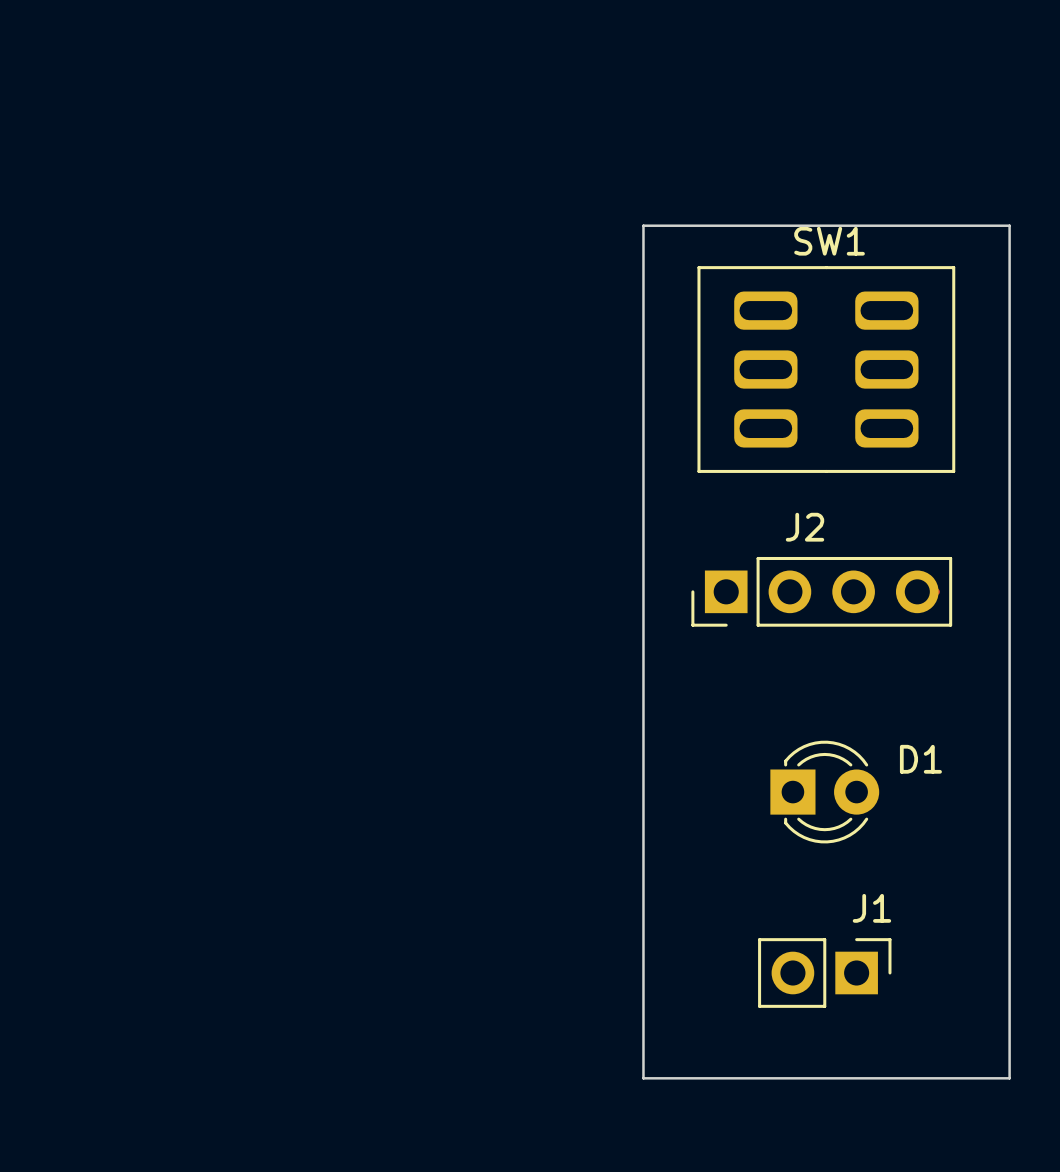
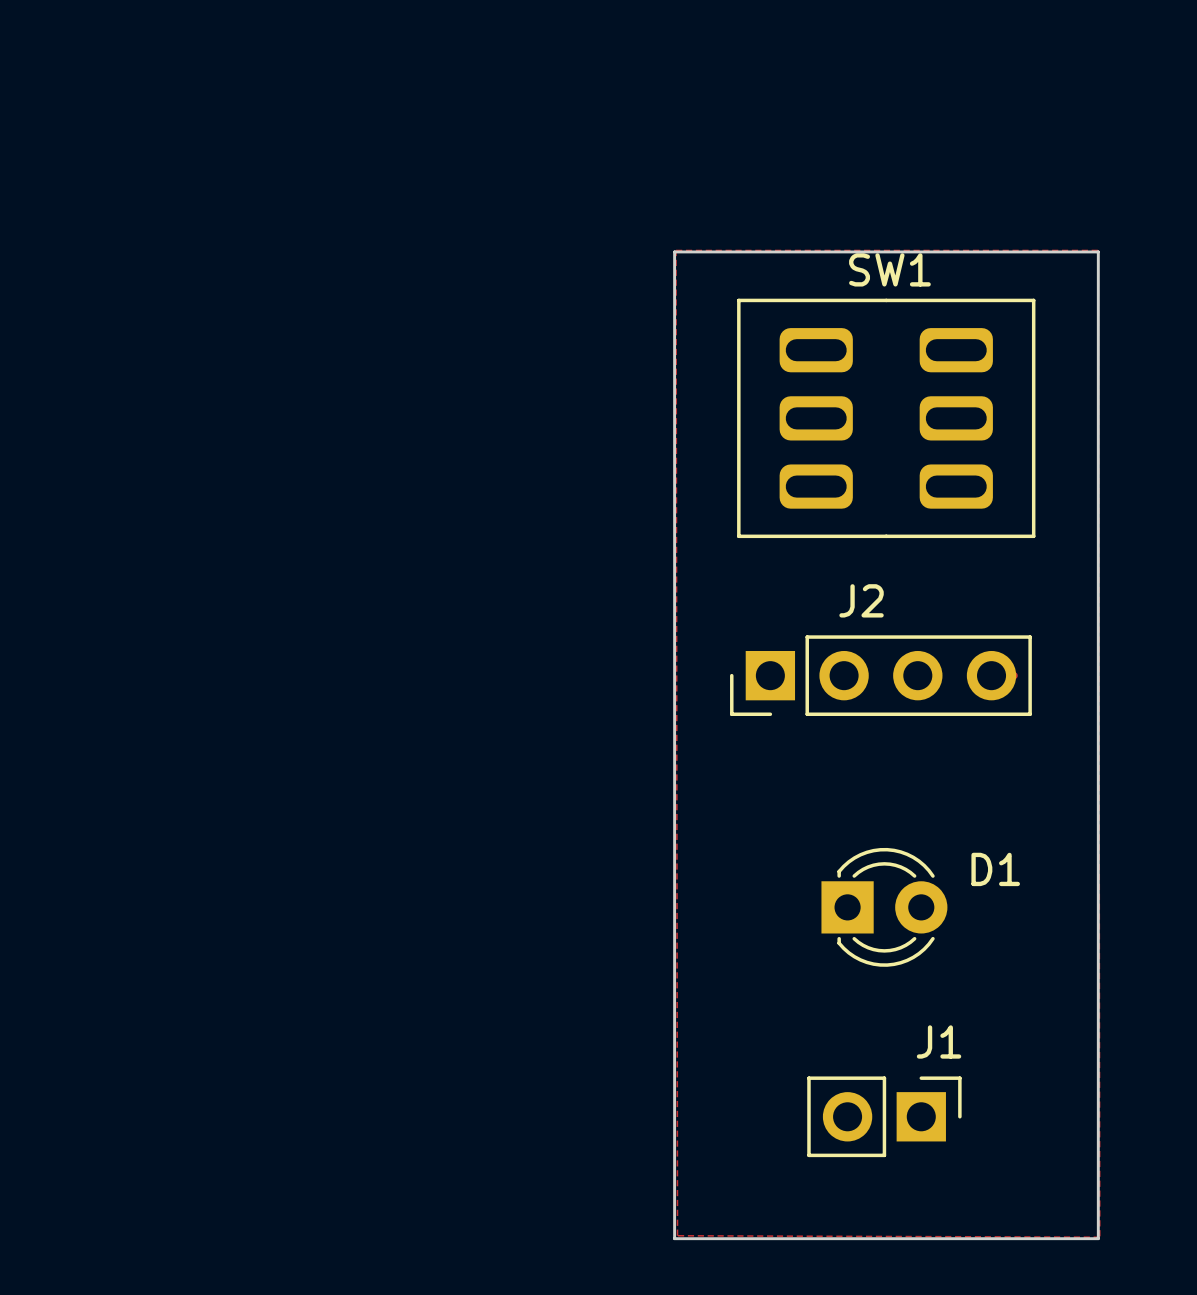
zone outline: none -> (676, 250) (1098, 250) (1099, 1237) (677, 1235) (676, 250)

